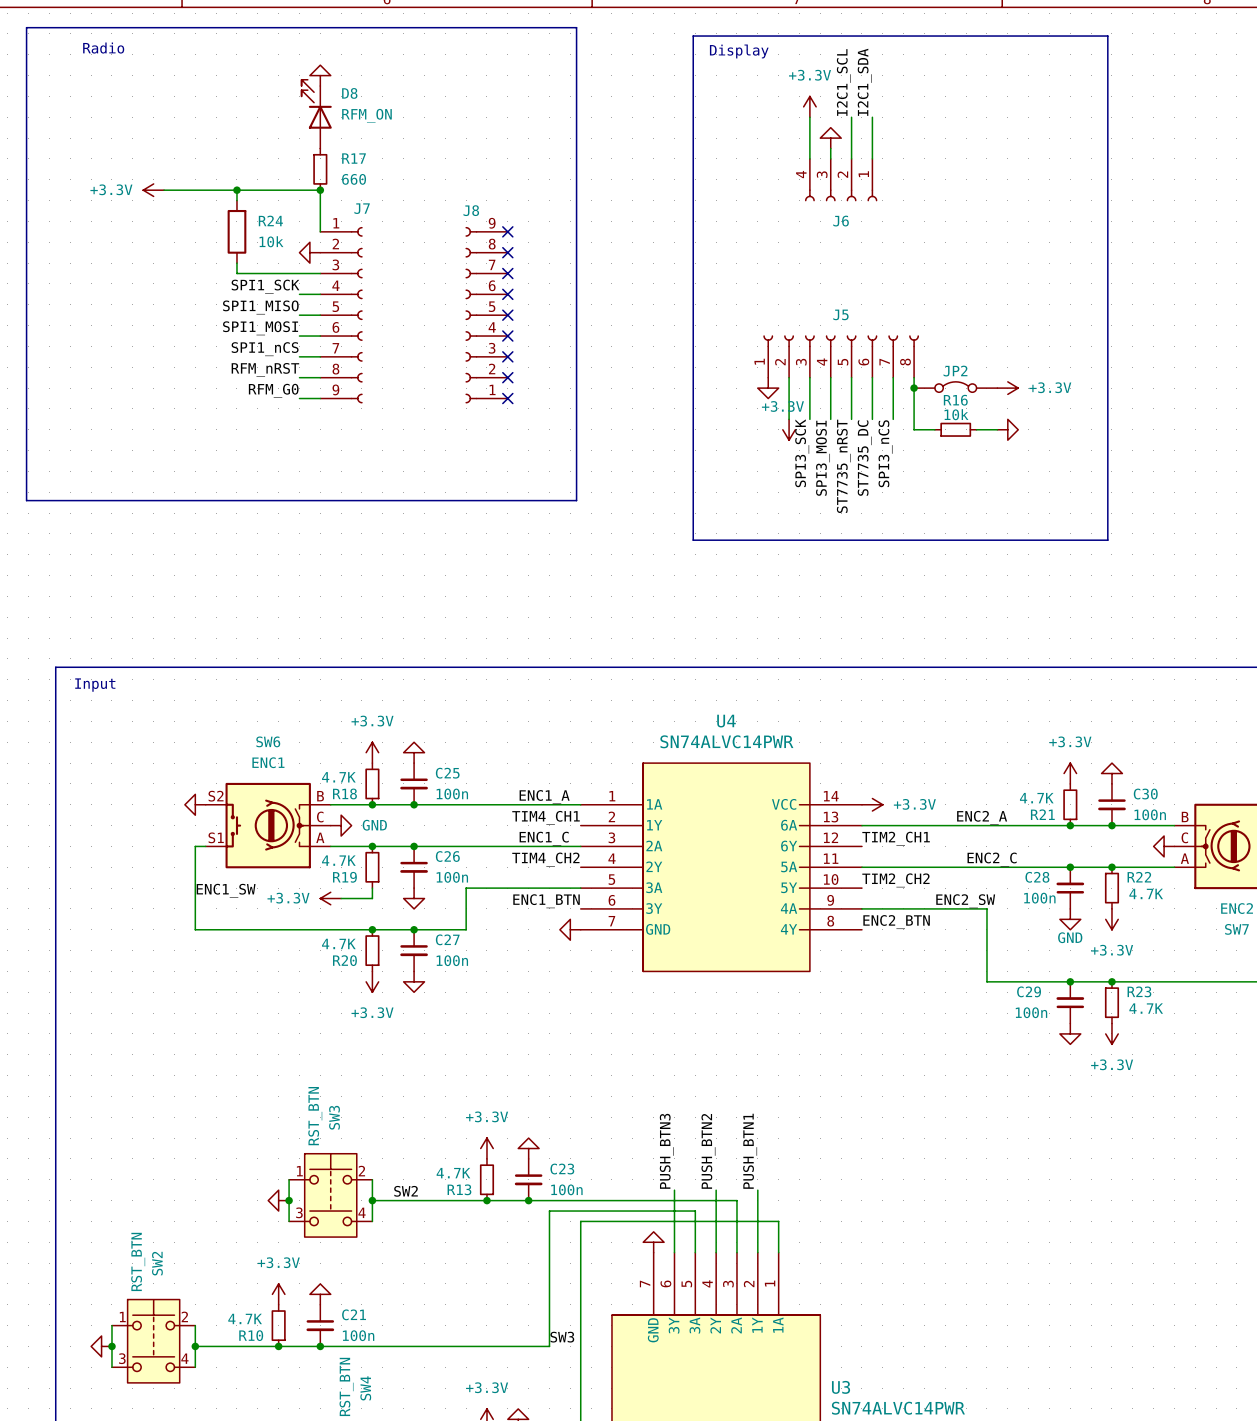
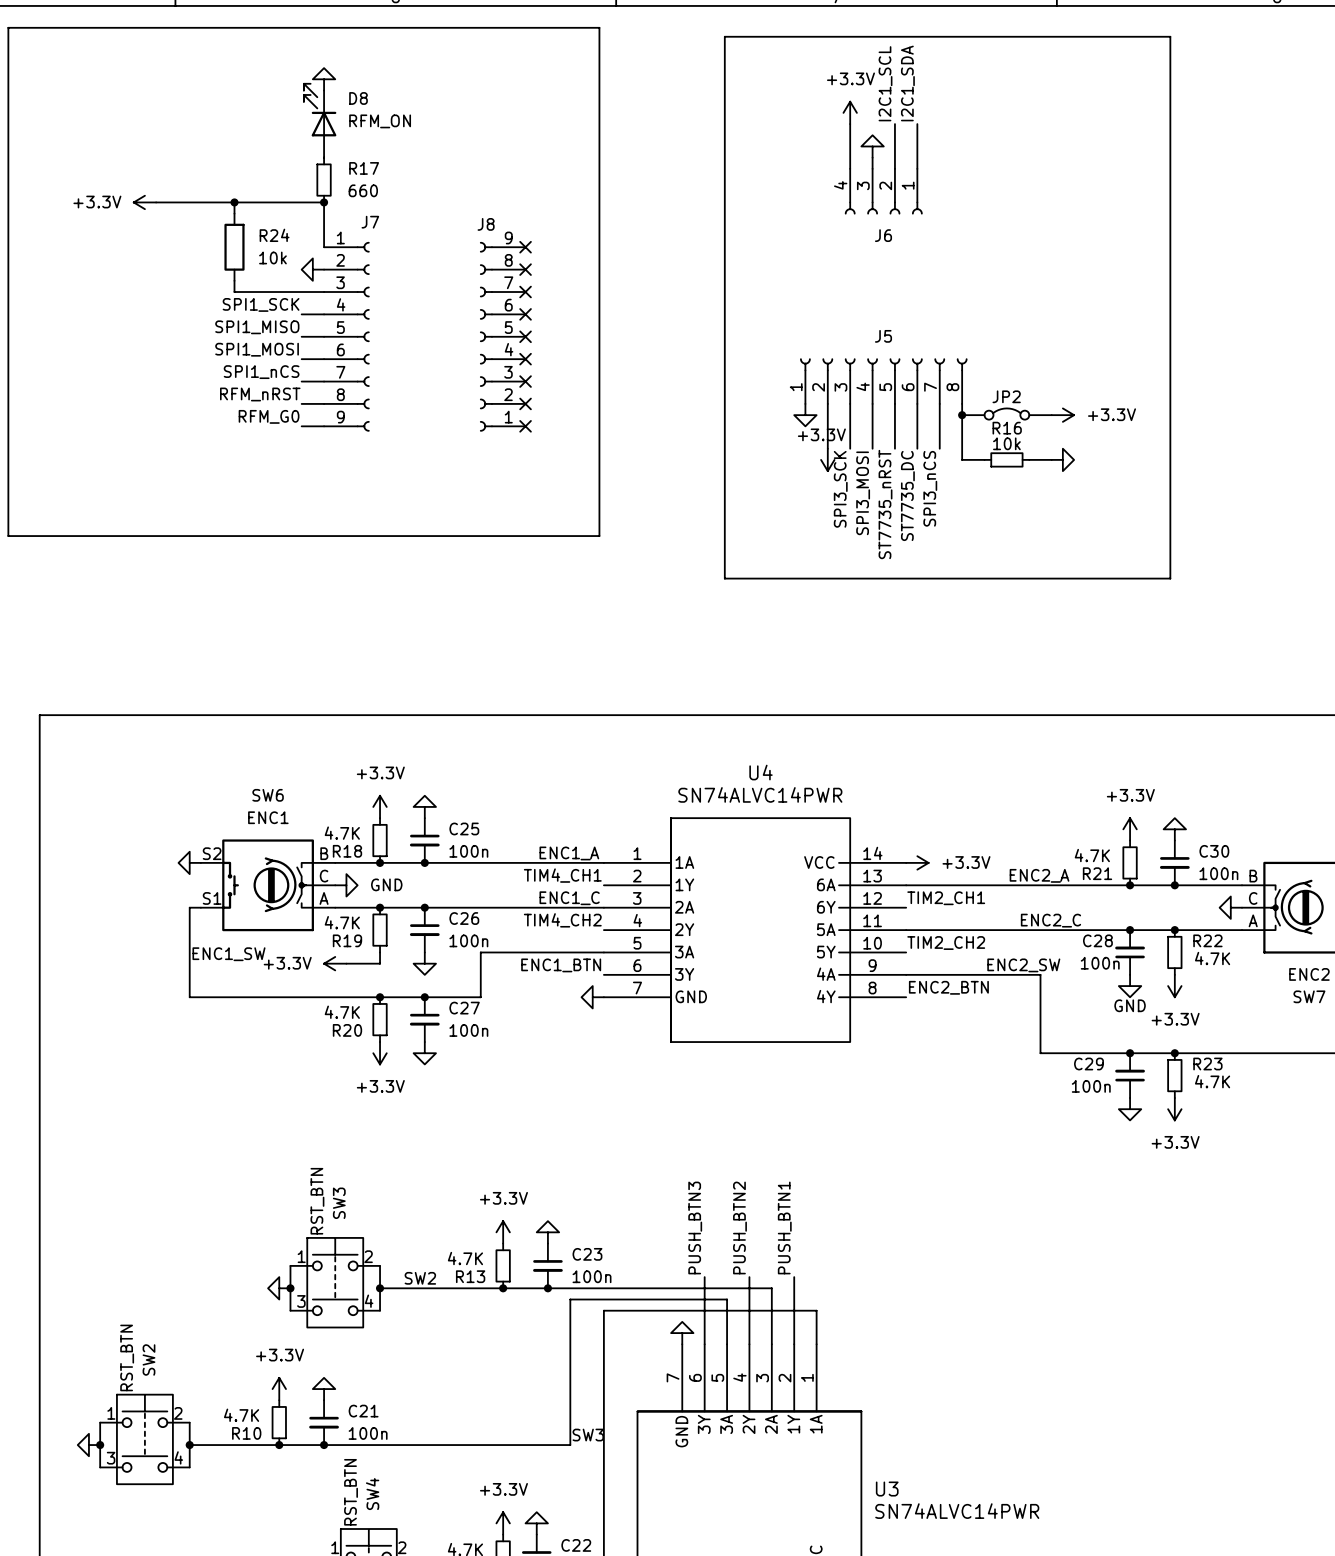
text: Radio (103, 48) -> none
text: Display (739, 51) -> none
text: Input (95, 685) -> none

